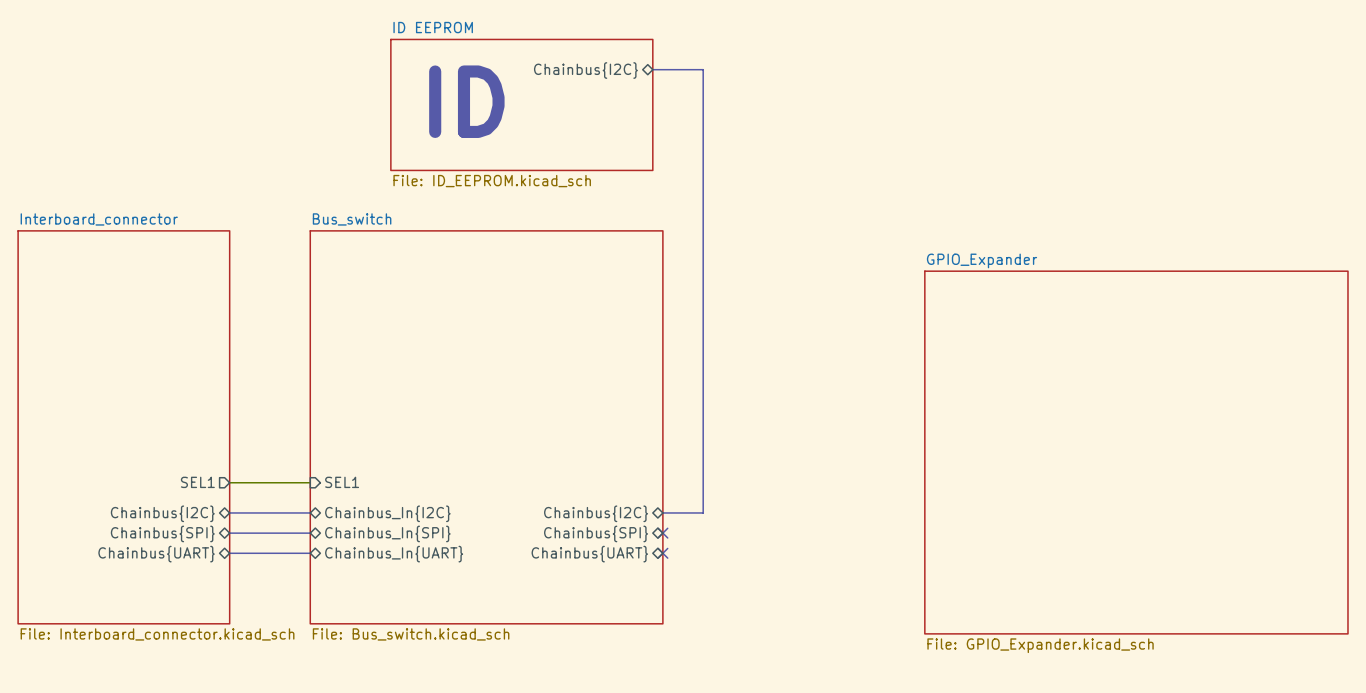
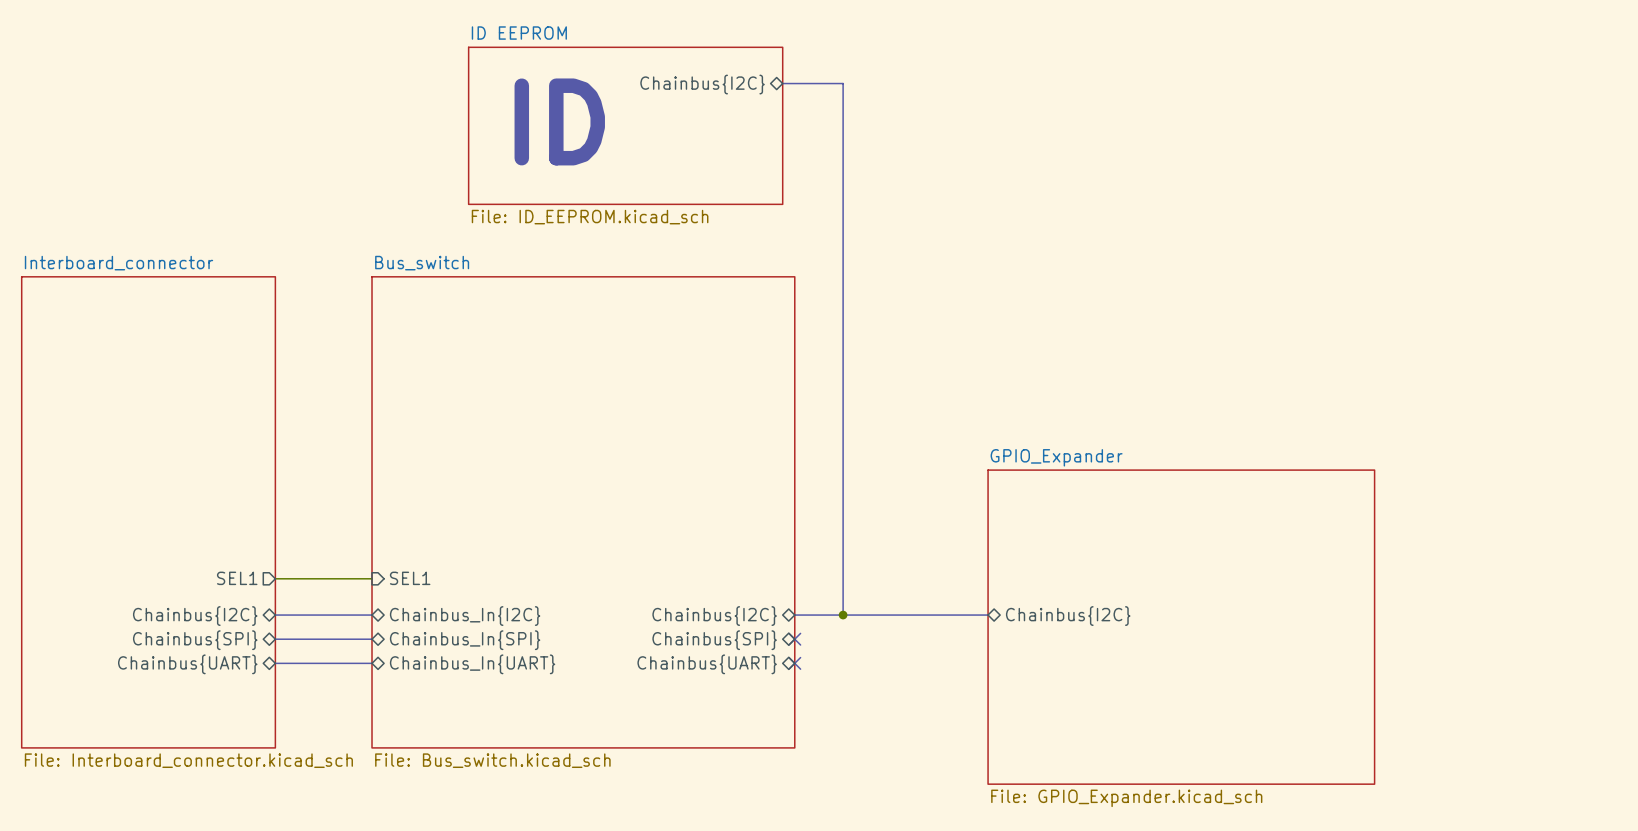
sheet GPIO_Expander: File: GPIO_Expander.kicad_sch (1136, 452) -> none
bus: none -> (843, 615) (988, 615)
junction: none -> (843, 615)
sheet pin: none -> Chainbus{I2C} (1068, 616)
sheet GPIO_Expander: none -> File: GPIO_Expander.kicad_sch (1181, 627)

